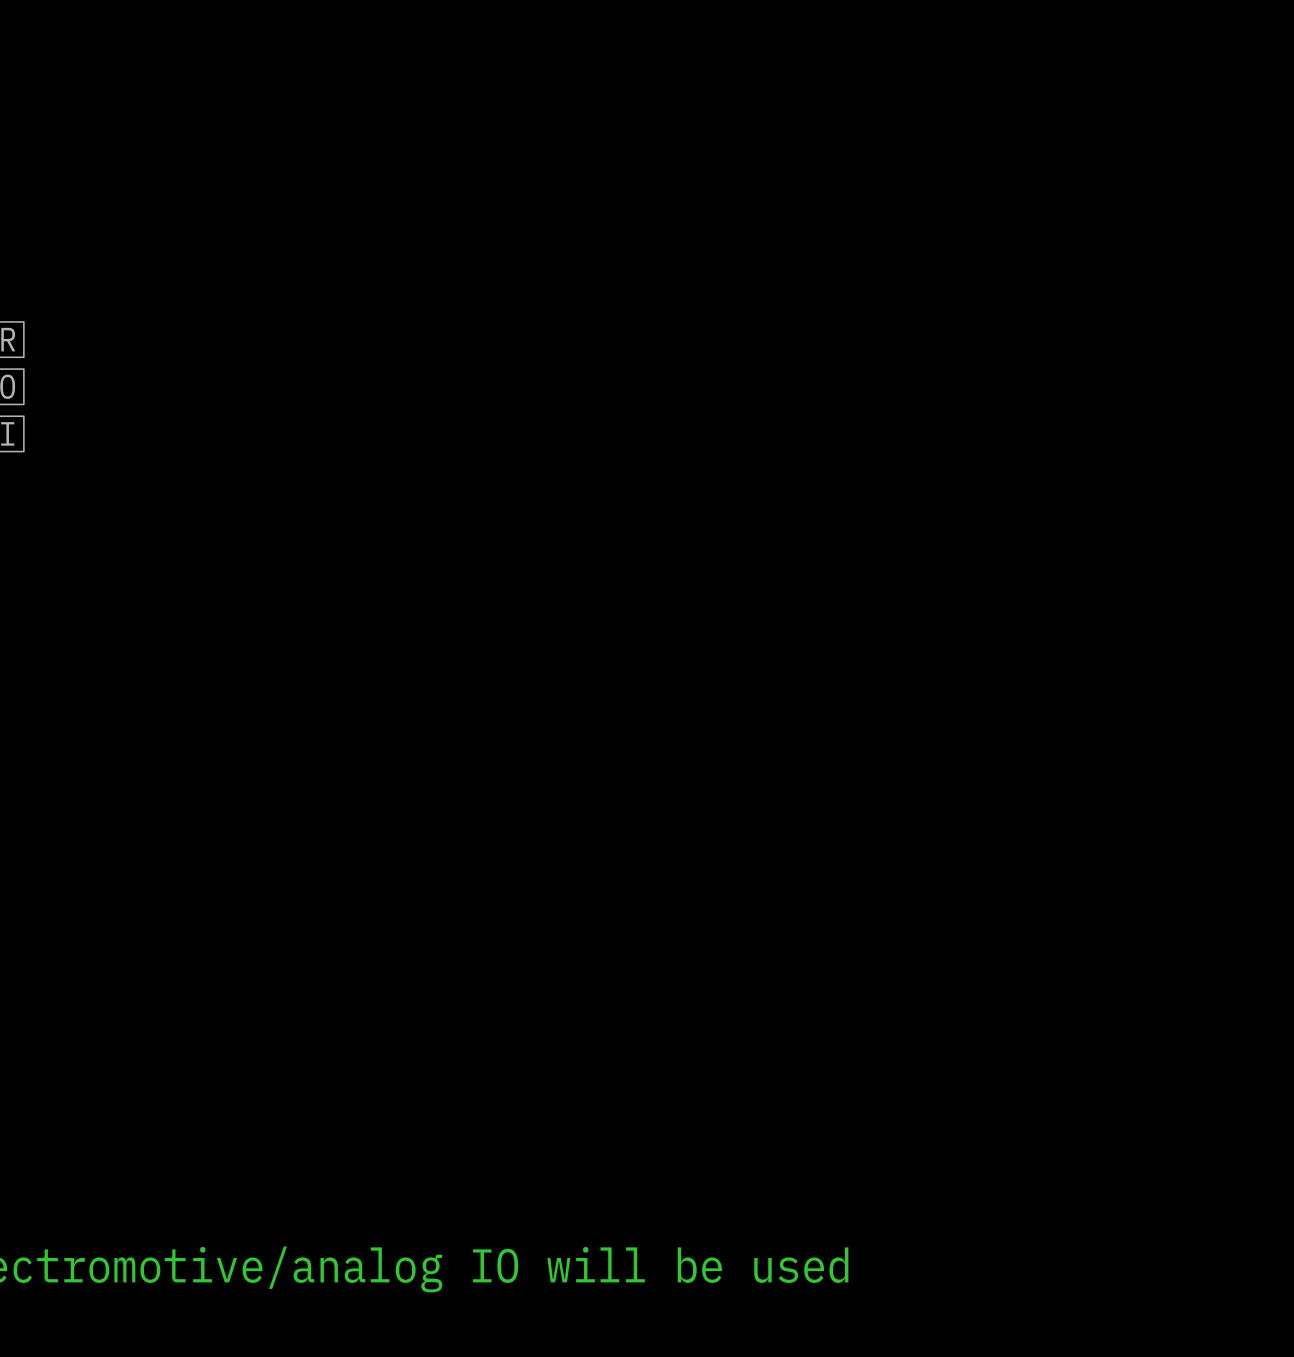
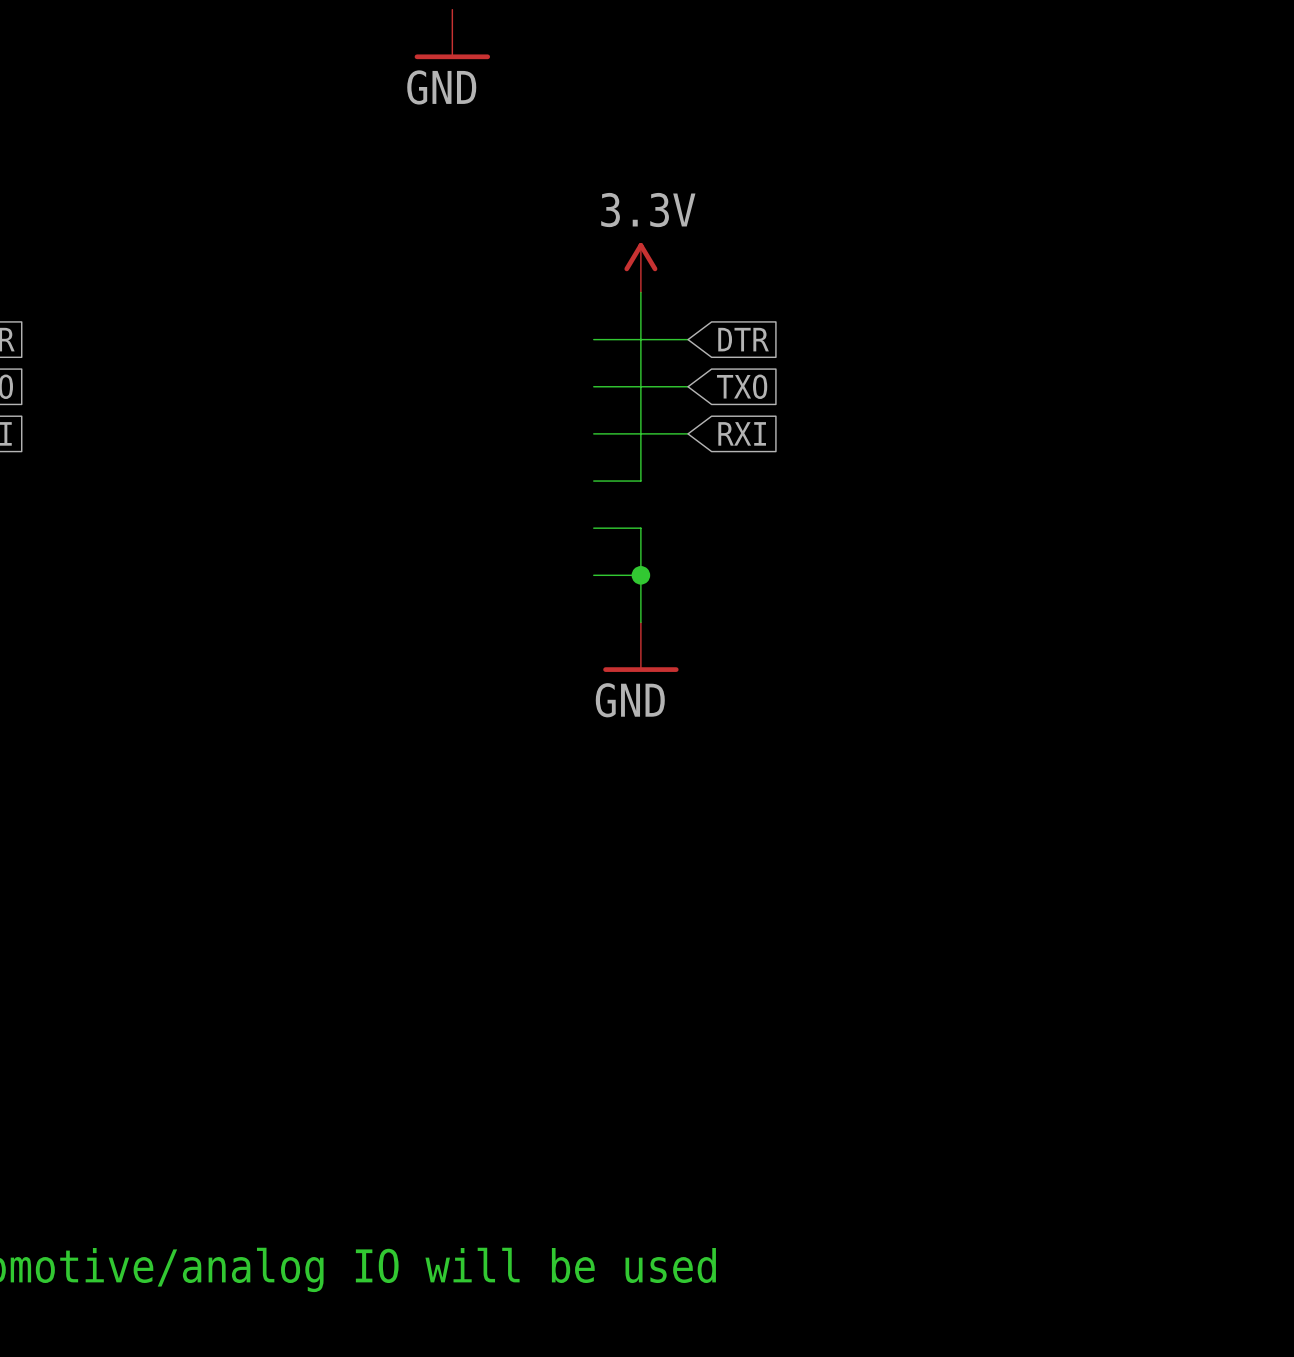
power symbol: none -> GND (452, 34)
power symbol: none -> 3.3V (640, 267)
wire: none -> (640, 292) (640, 481) (593, 481)
wire: none -> (593, 339) (688, 339)
global label: none -> DTR (743, 339)
wire: none -> (593, 386) (688, 386)
global label: none -> TXO (742, 386)
wire: none -> (593, 433) (688, 433)
global label: none -> RXI (742, 433)
wire: none -> (593, 528) (640, 528) (640, 622)
wire: none -> (593, 575) (640, 575)
junction: none -> (640, 575)
power symbol: none -> GND (640, 647)

